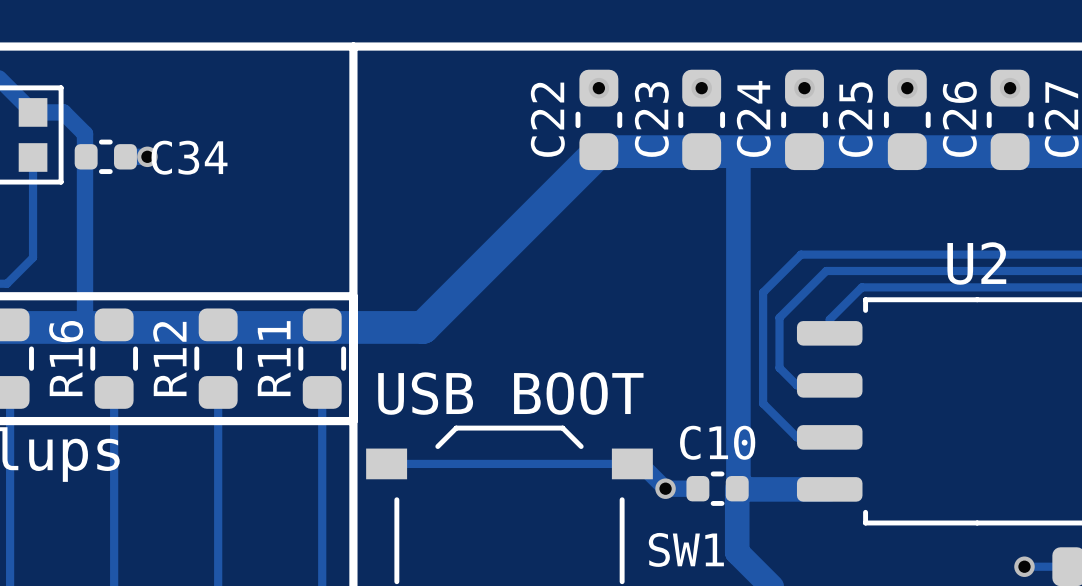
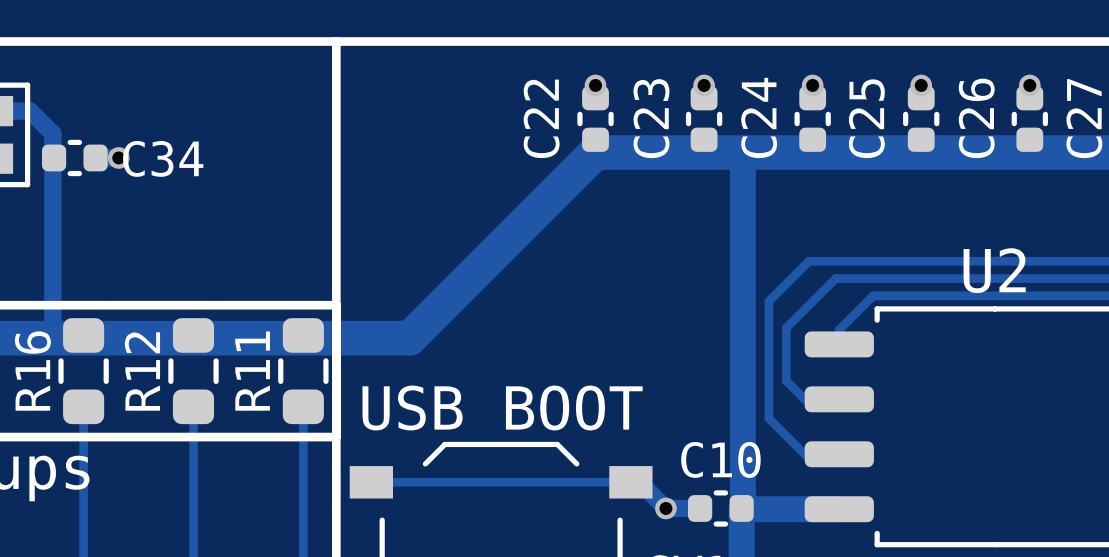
C22 footprint: [575, 69, 623, 171] -> [577, 86, 614, 152]
C23 footprint: [678, 69, 726, 171] -> [685, 86, 723, 152]
C24 footprint: [781, 69, 828, 171] -> [794, 86, 831, 152]
C25 footprint: [883, 69, 931, 171] -> [903, 86, 940, 152]
C26 footprint: [986, 69, 1034, 171] -> [1011, 86, 1048, 152]

